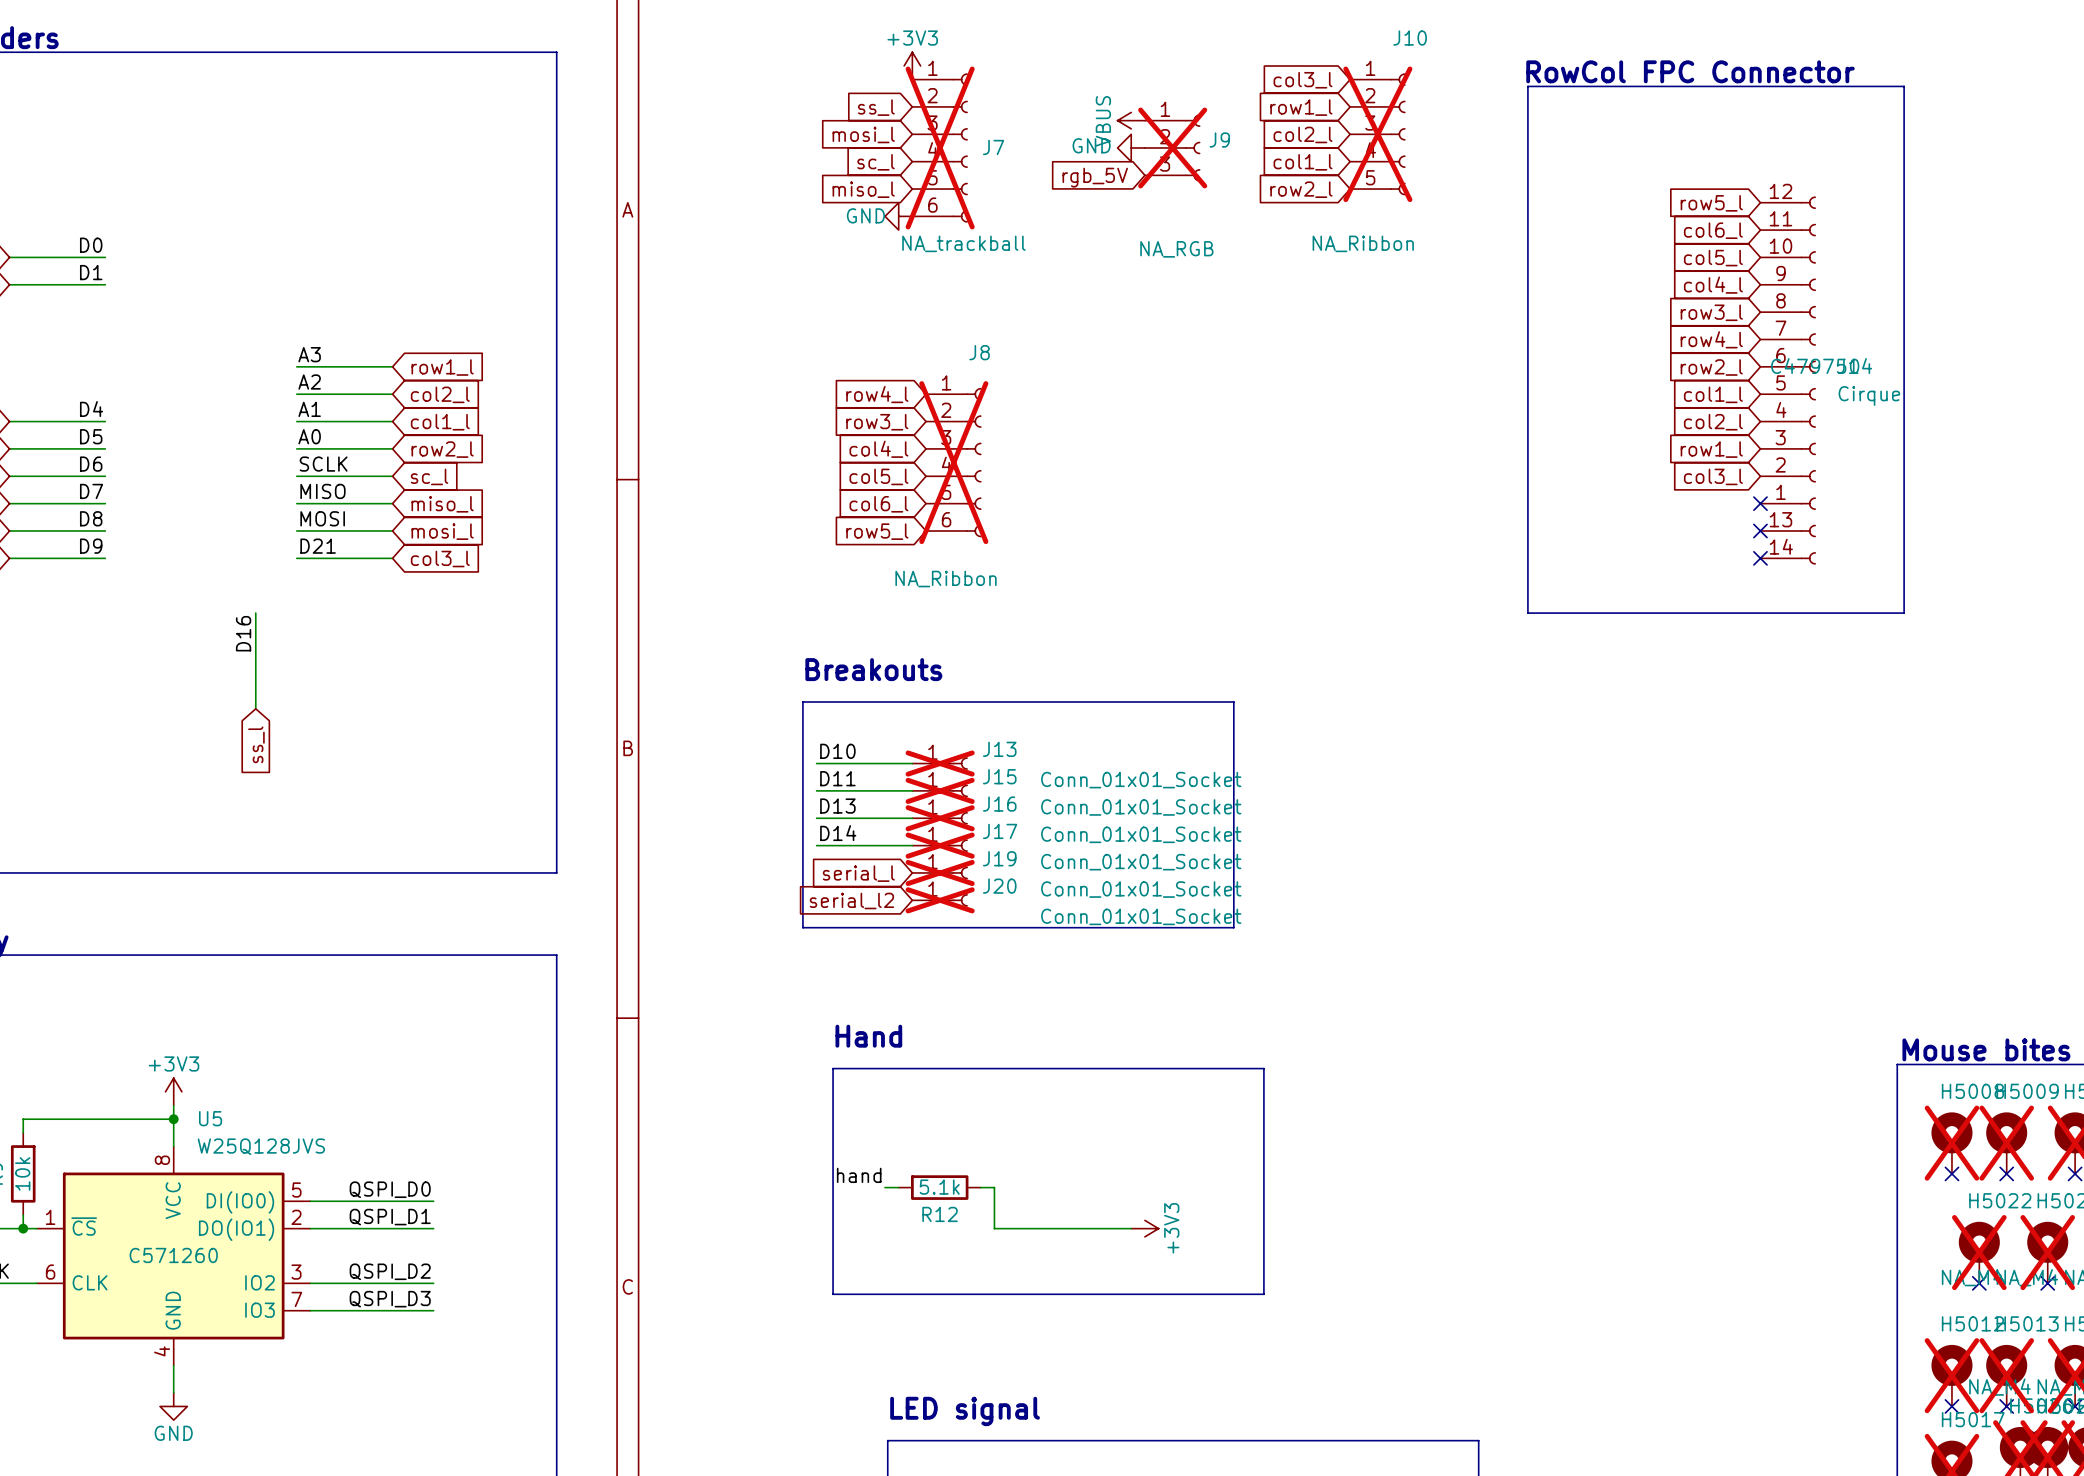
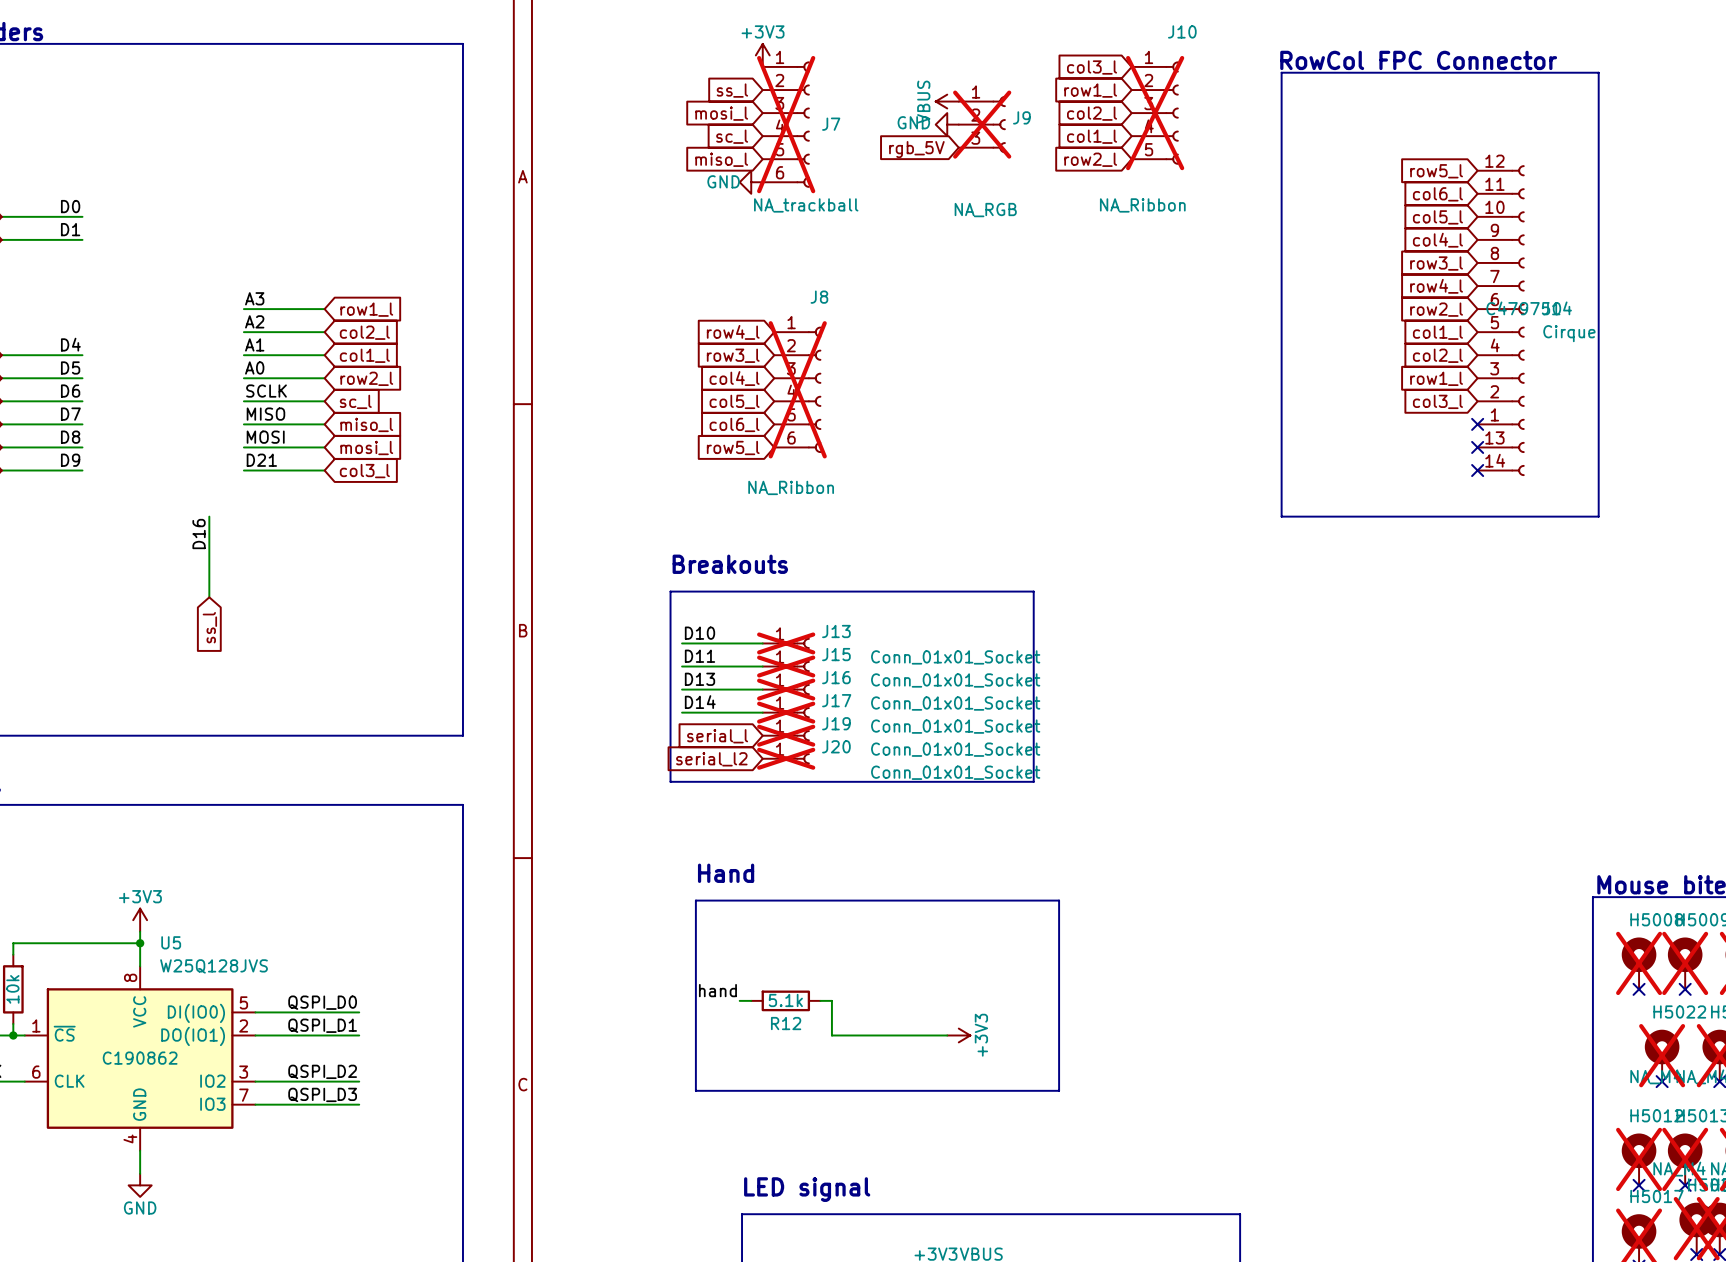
U5 text: C571260 (173, 1255) -> C190862 (140, 1058)

